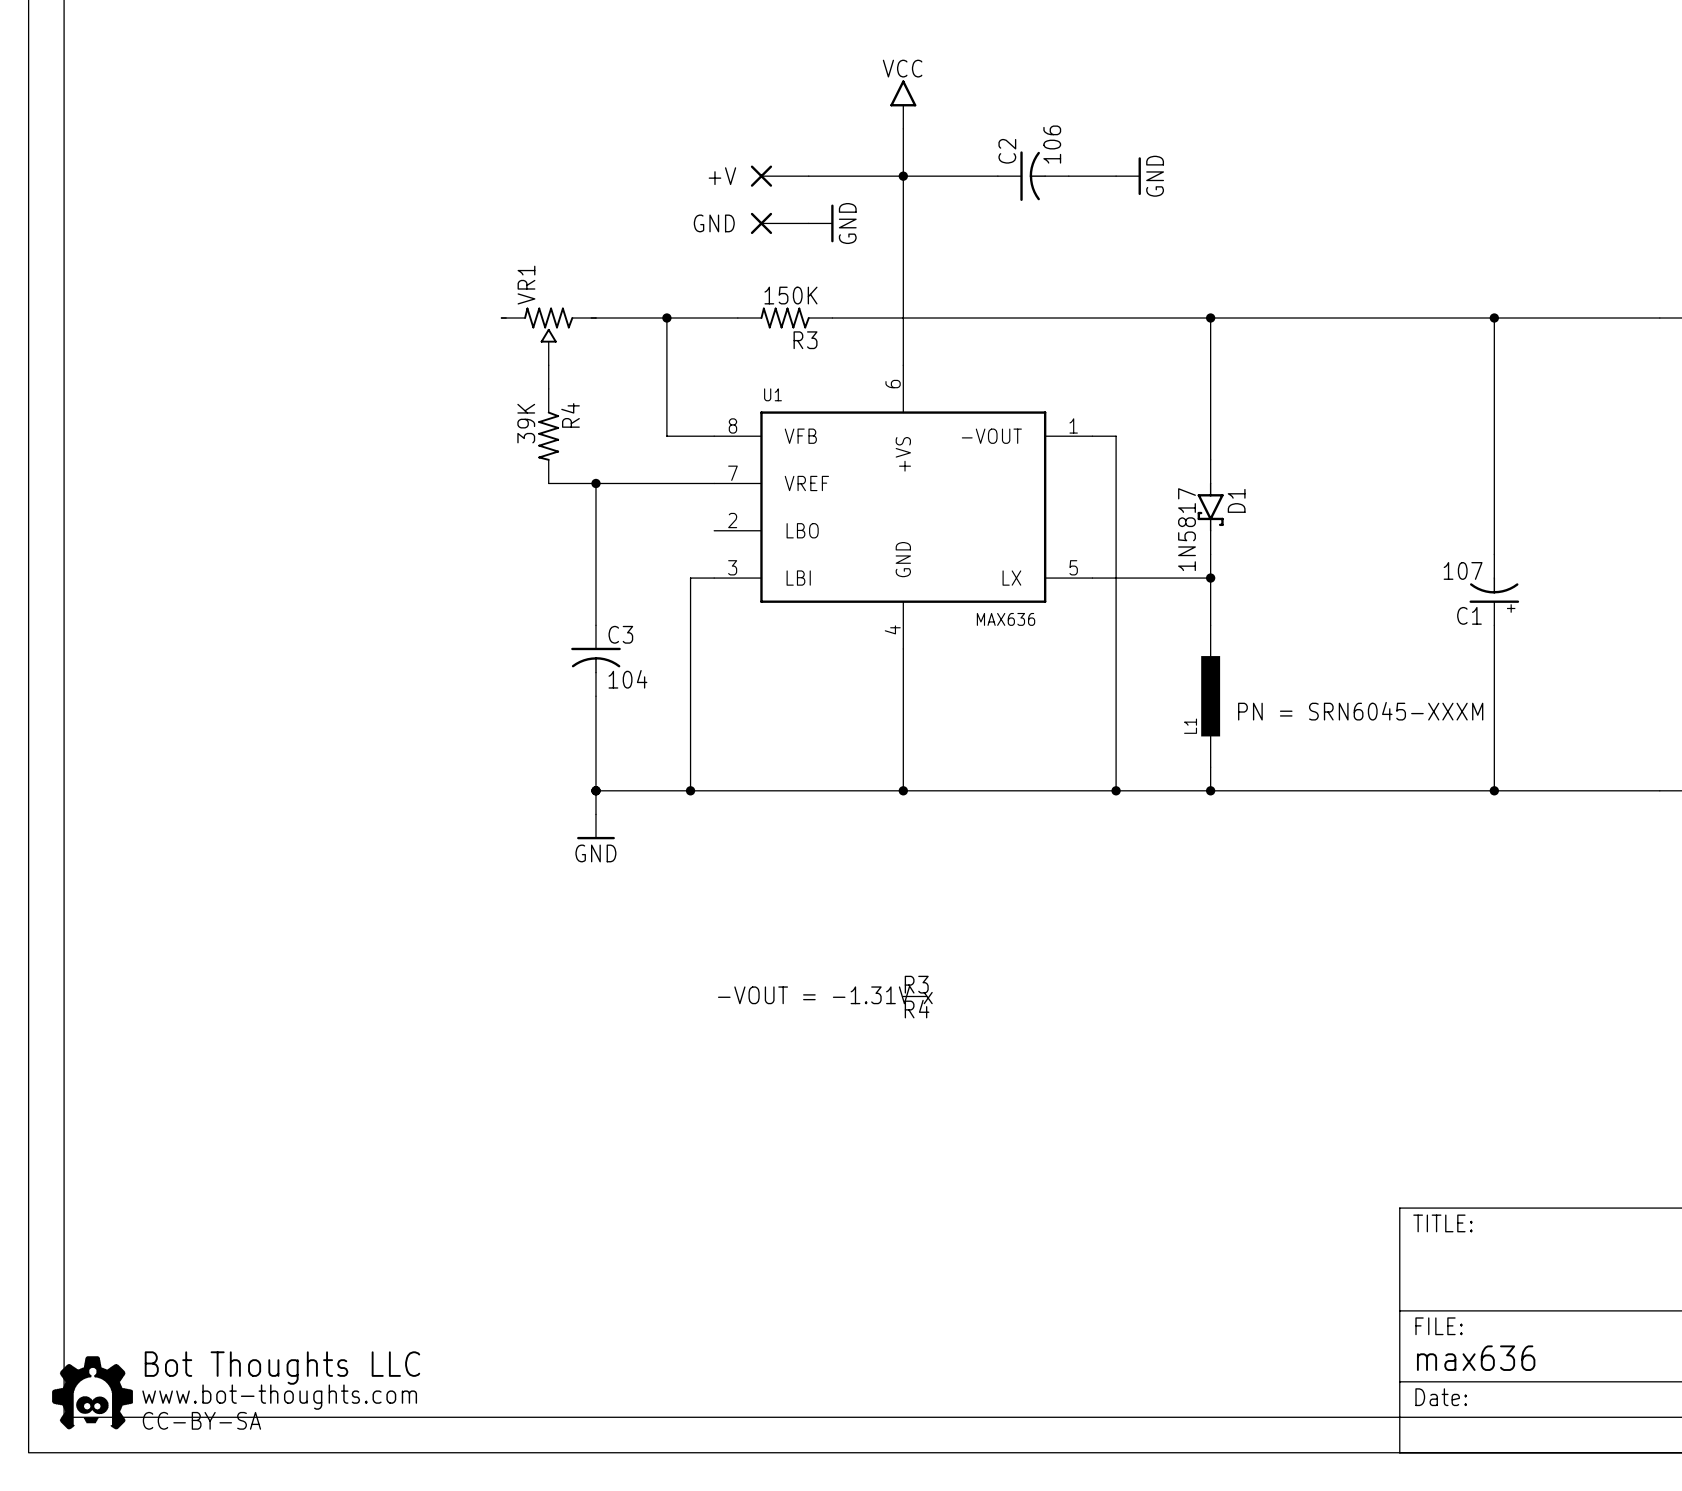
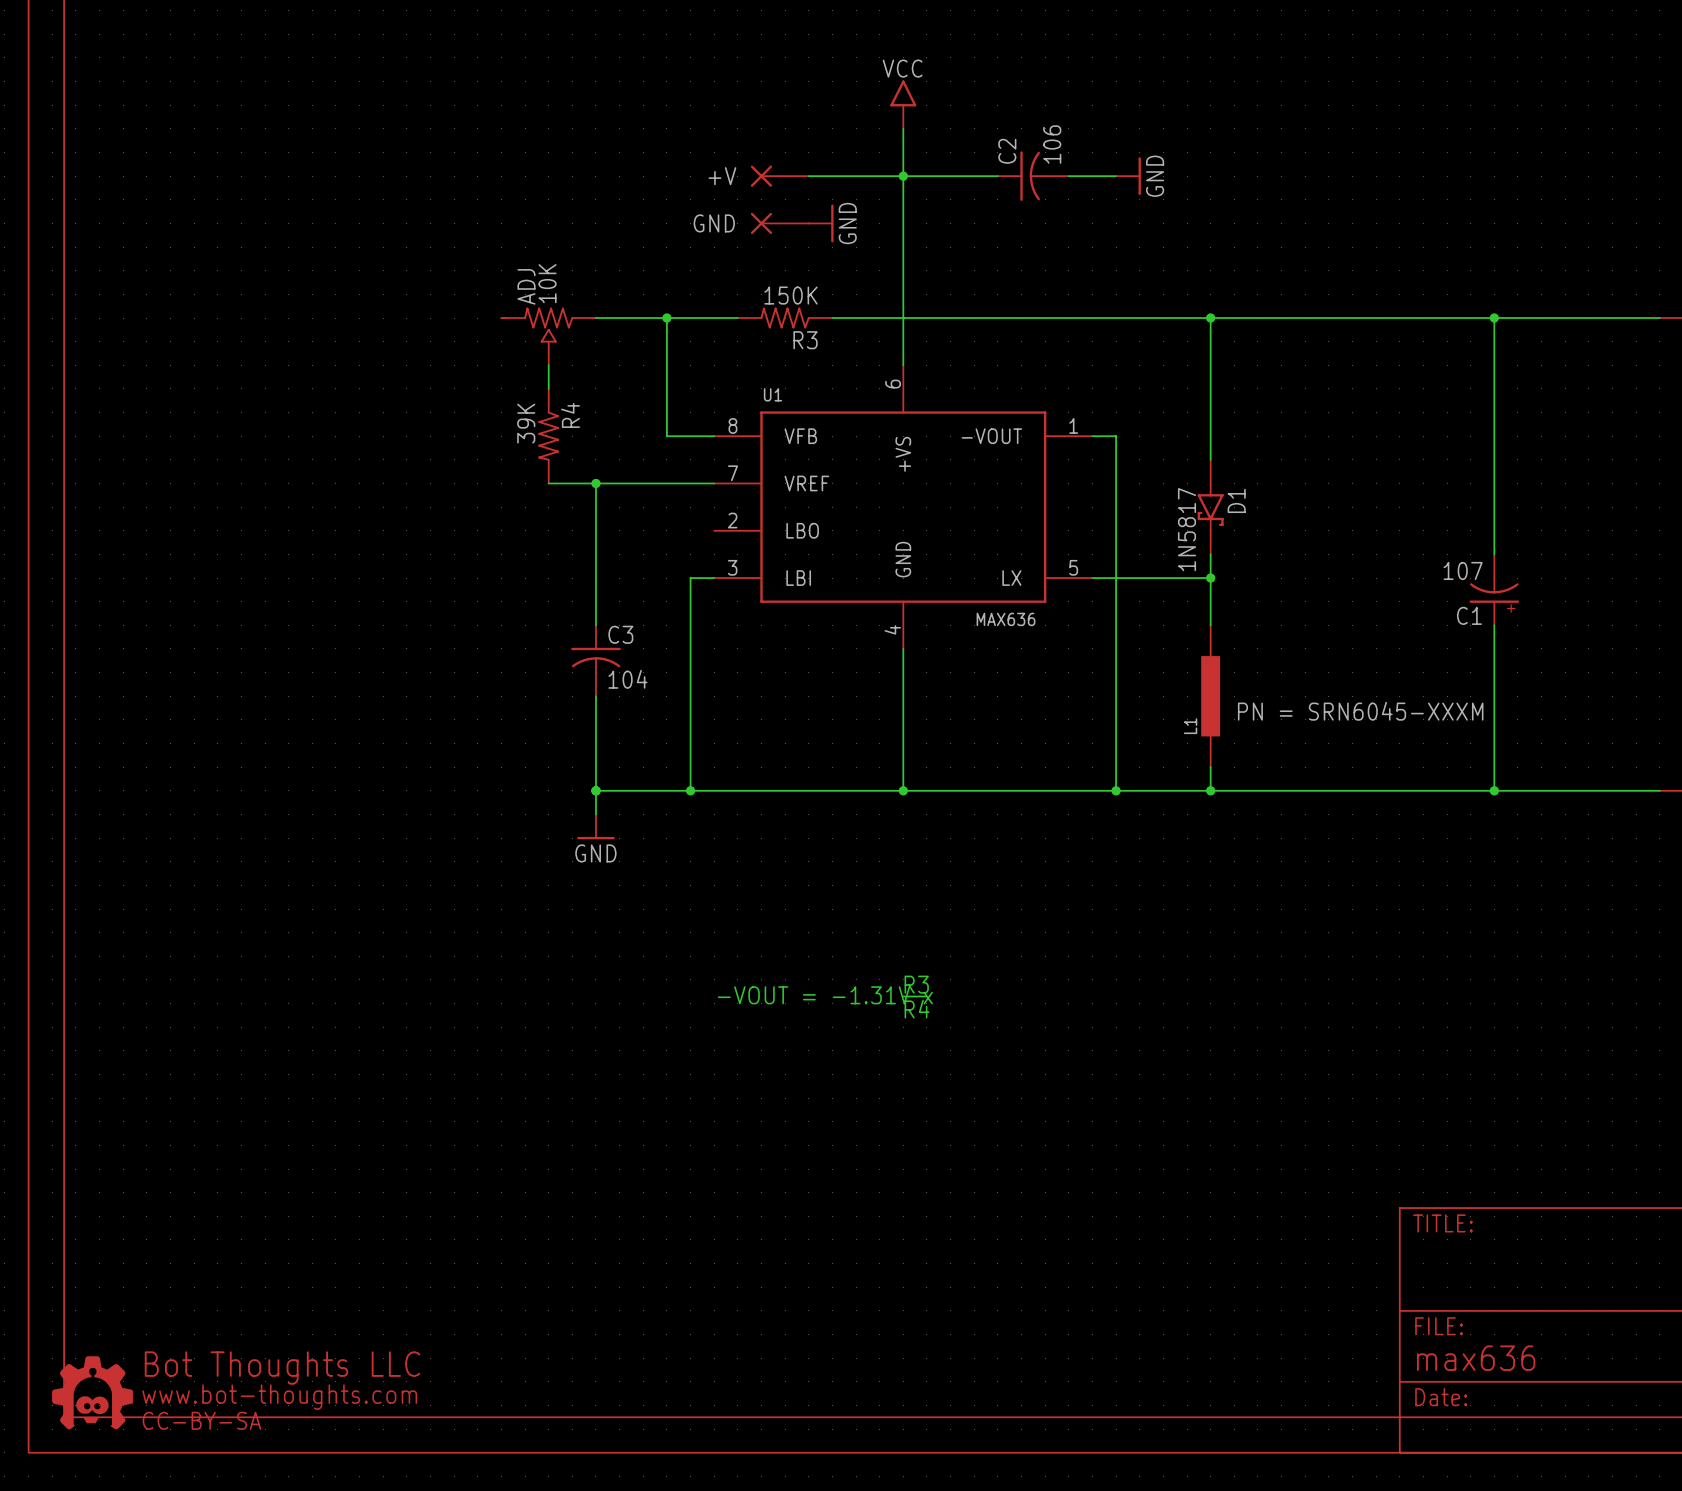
VR1 value: none -> 10K (547, 283)
VR1 name: VR1 (526, 285) -> ADJ (526, 286)

